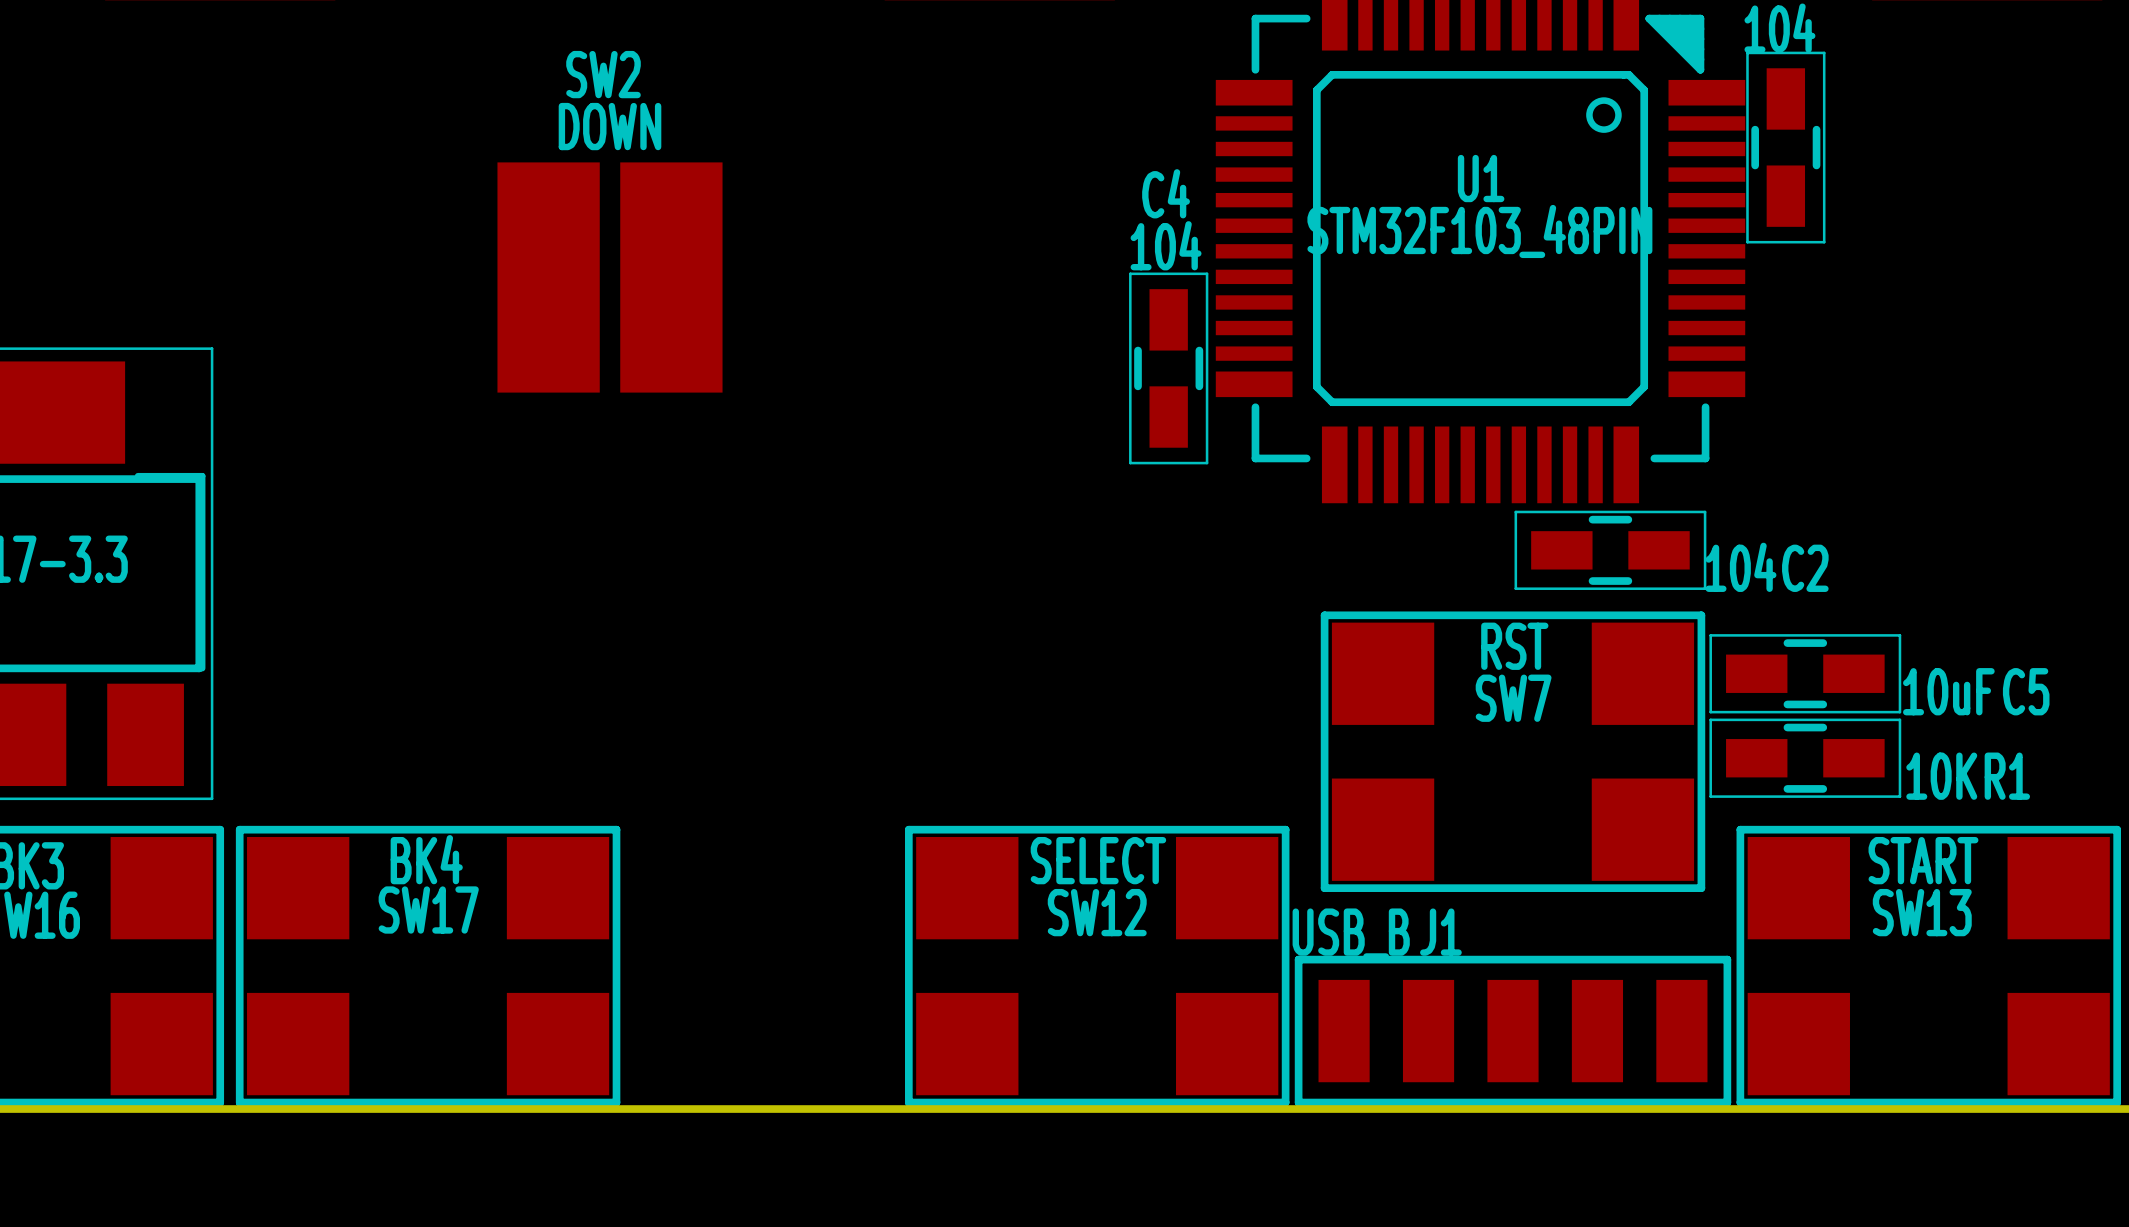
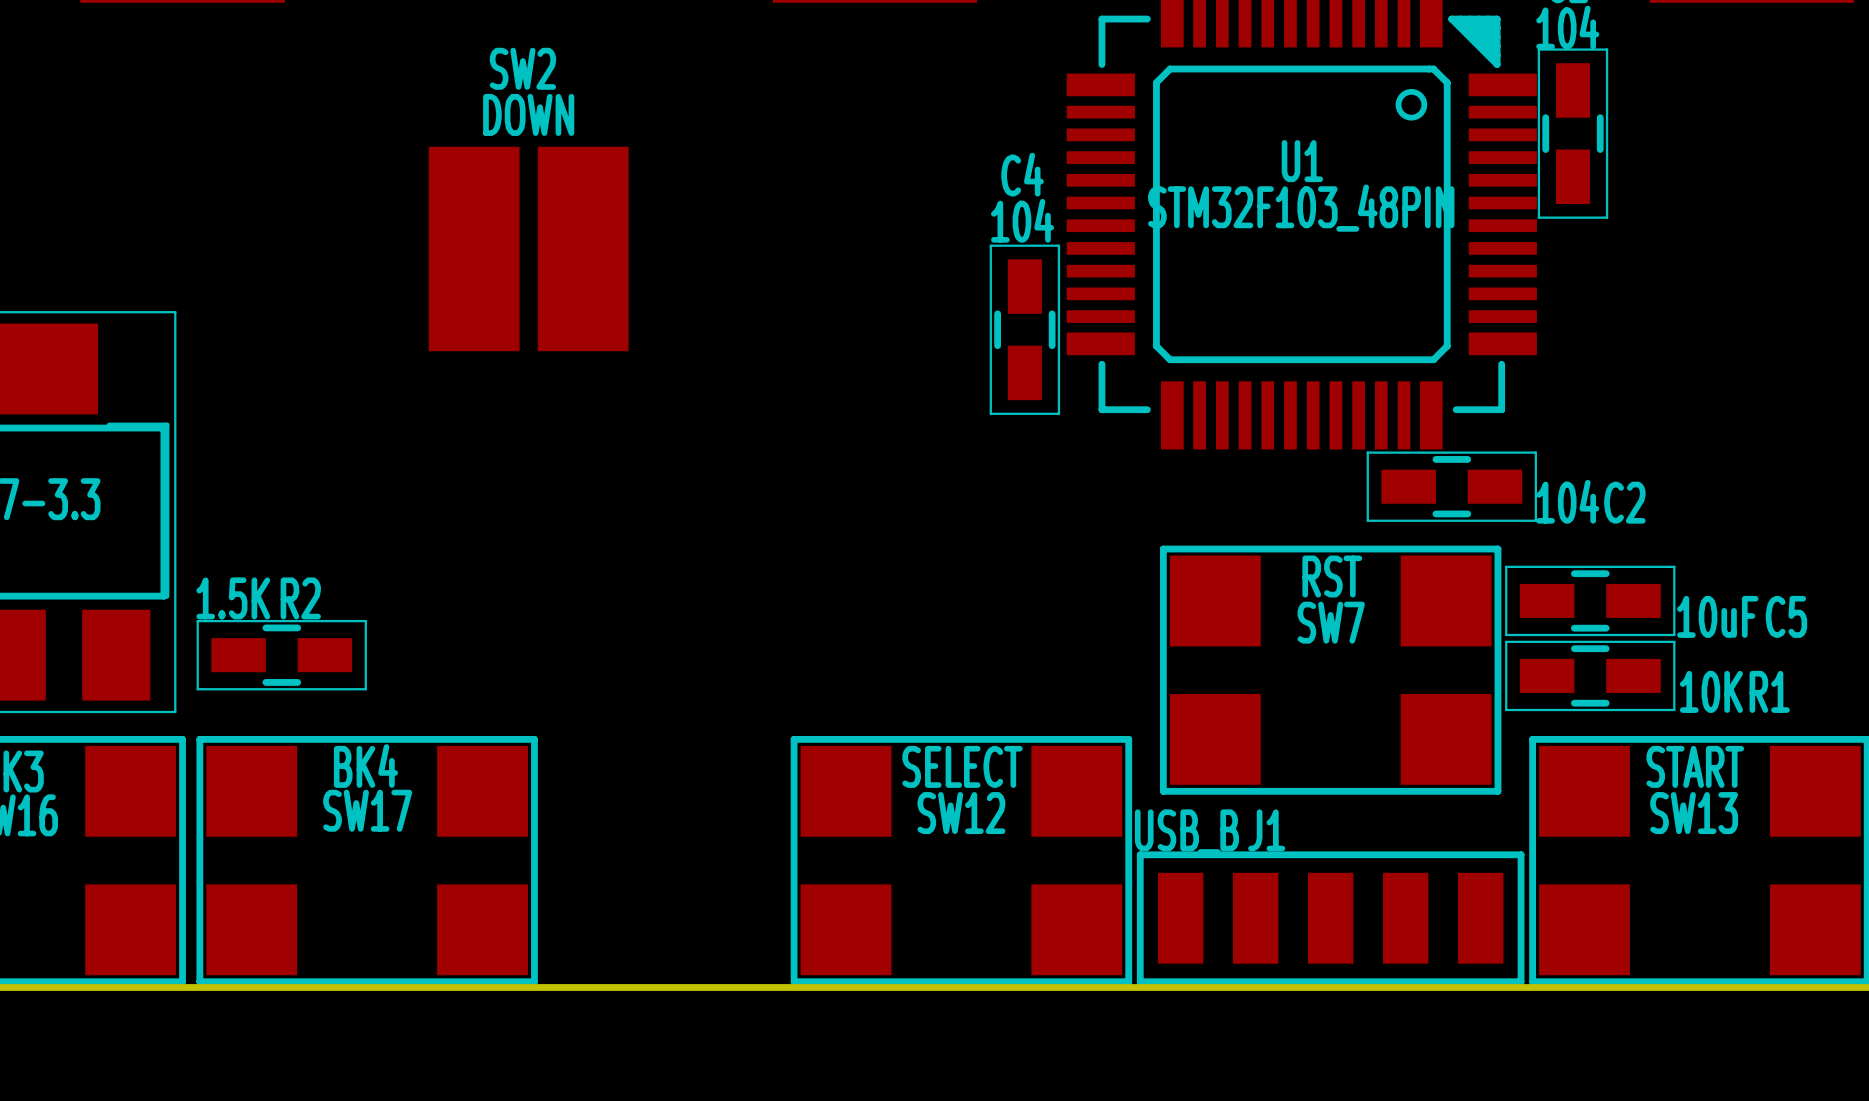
C2 position: (1610, 550) -> (1451, 486)
R2: none -> 1.5K (281, 655)

